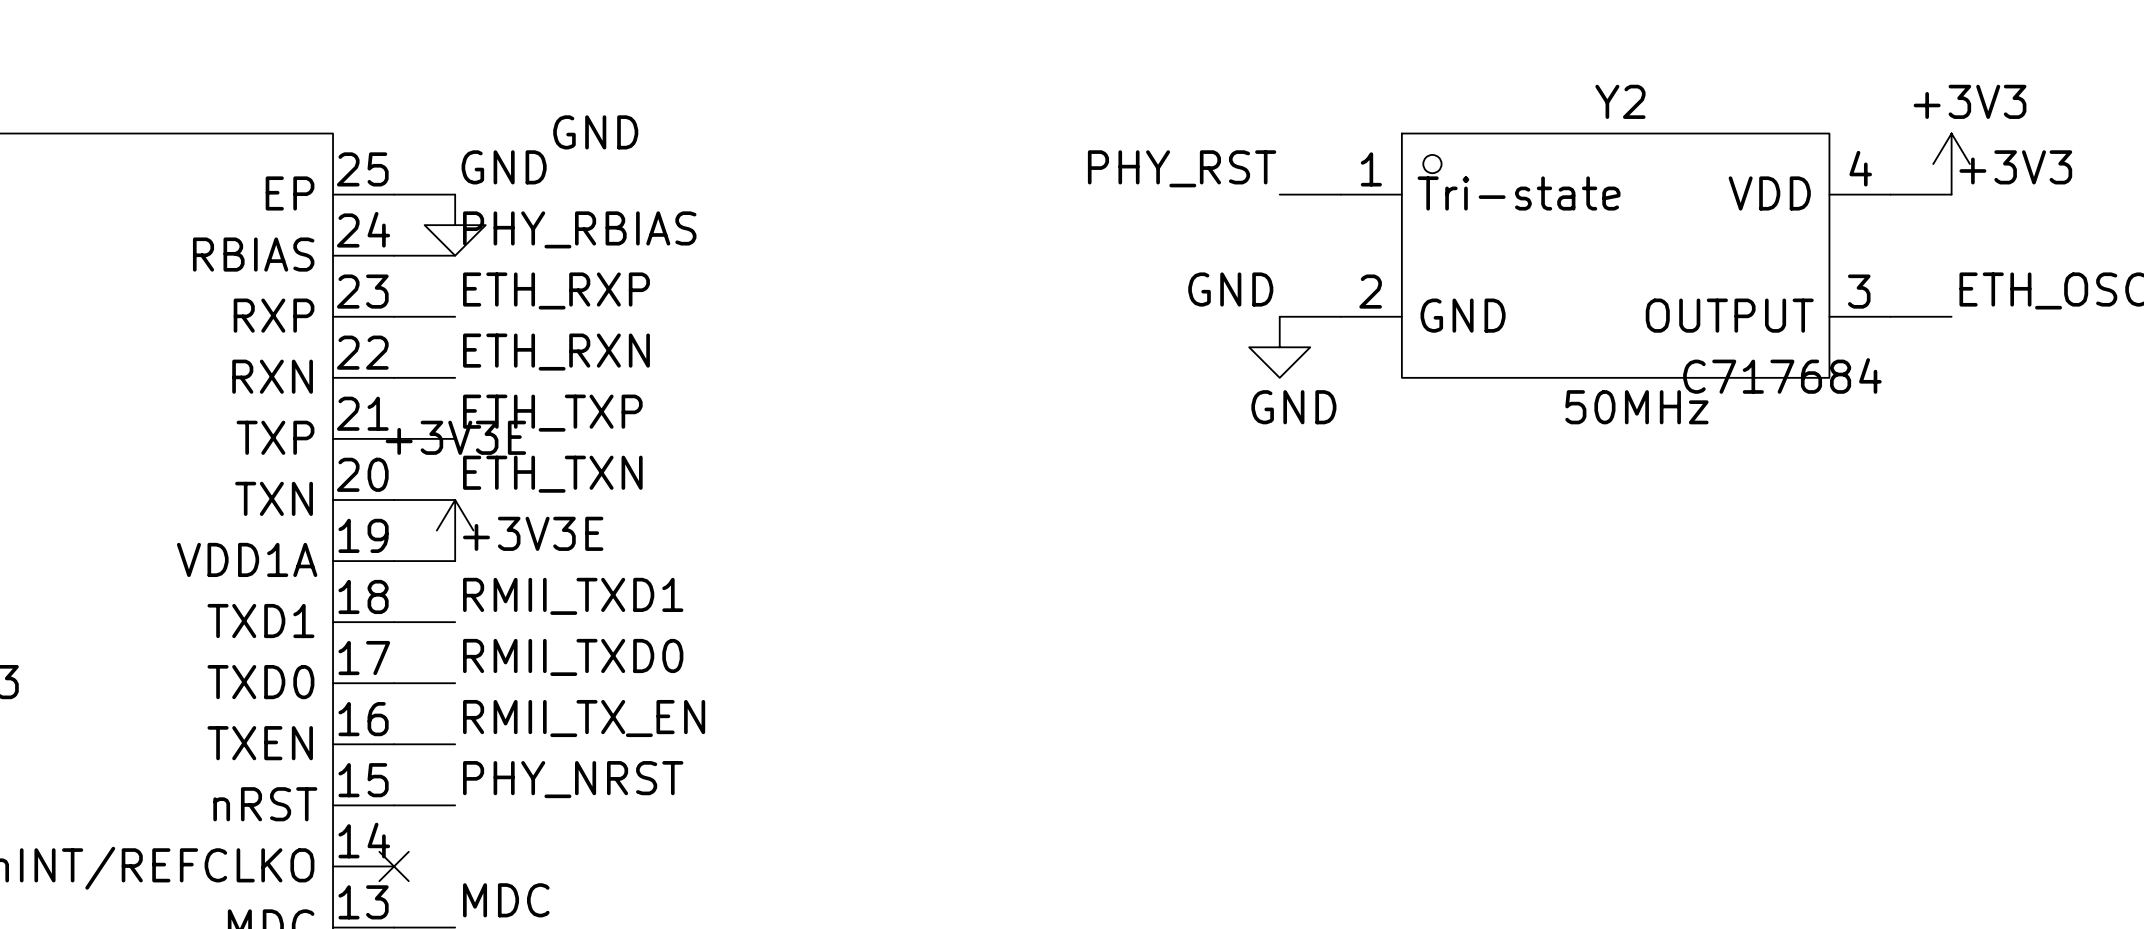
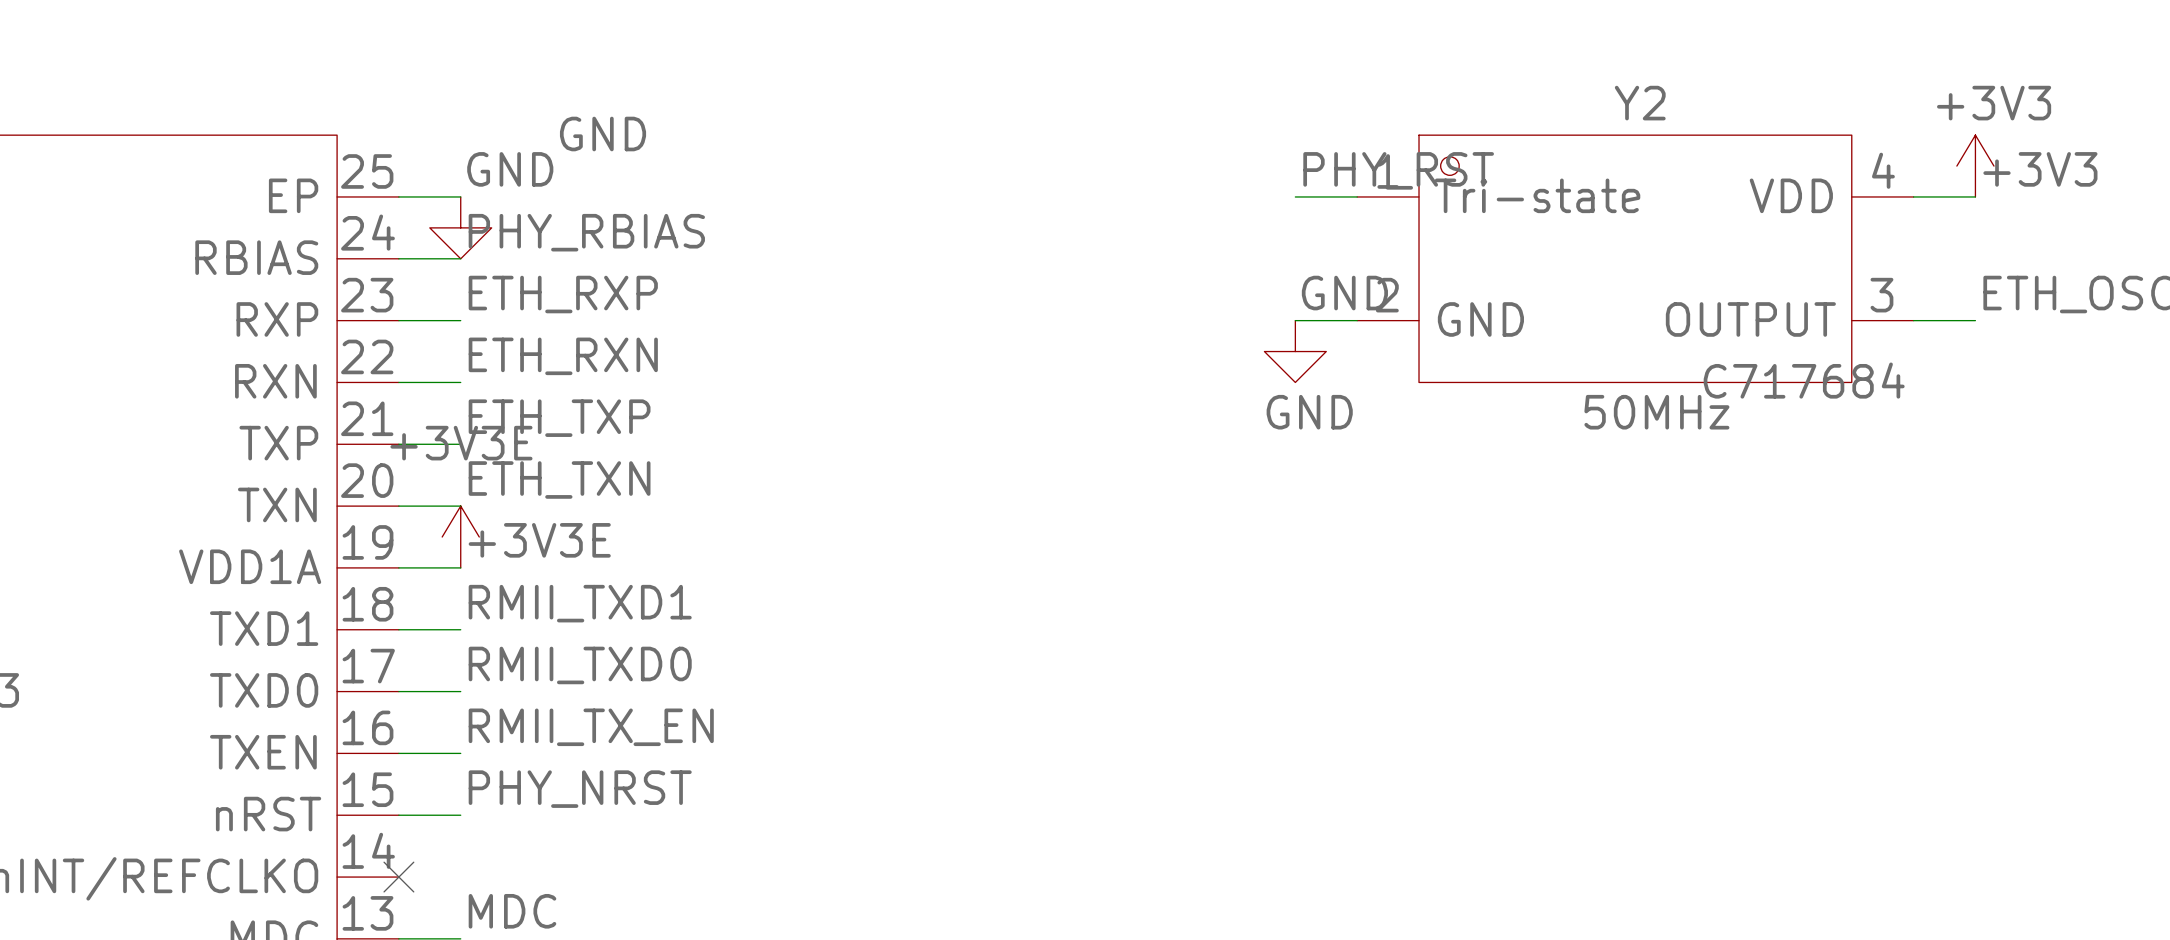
label position: PHY_RST (1182, 168) -> PHY_RST (1398, 170)
label position: GND (1230, 289) -> GND (1344, 293)

